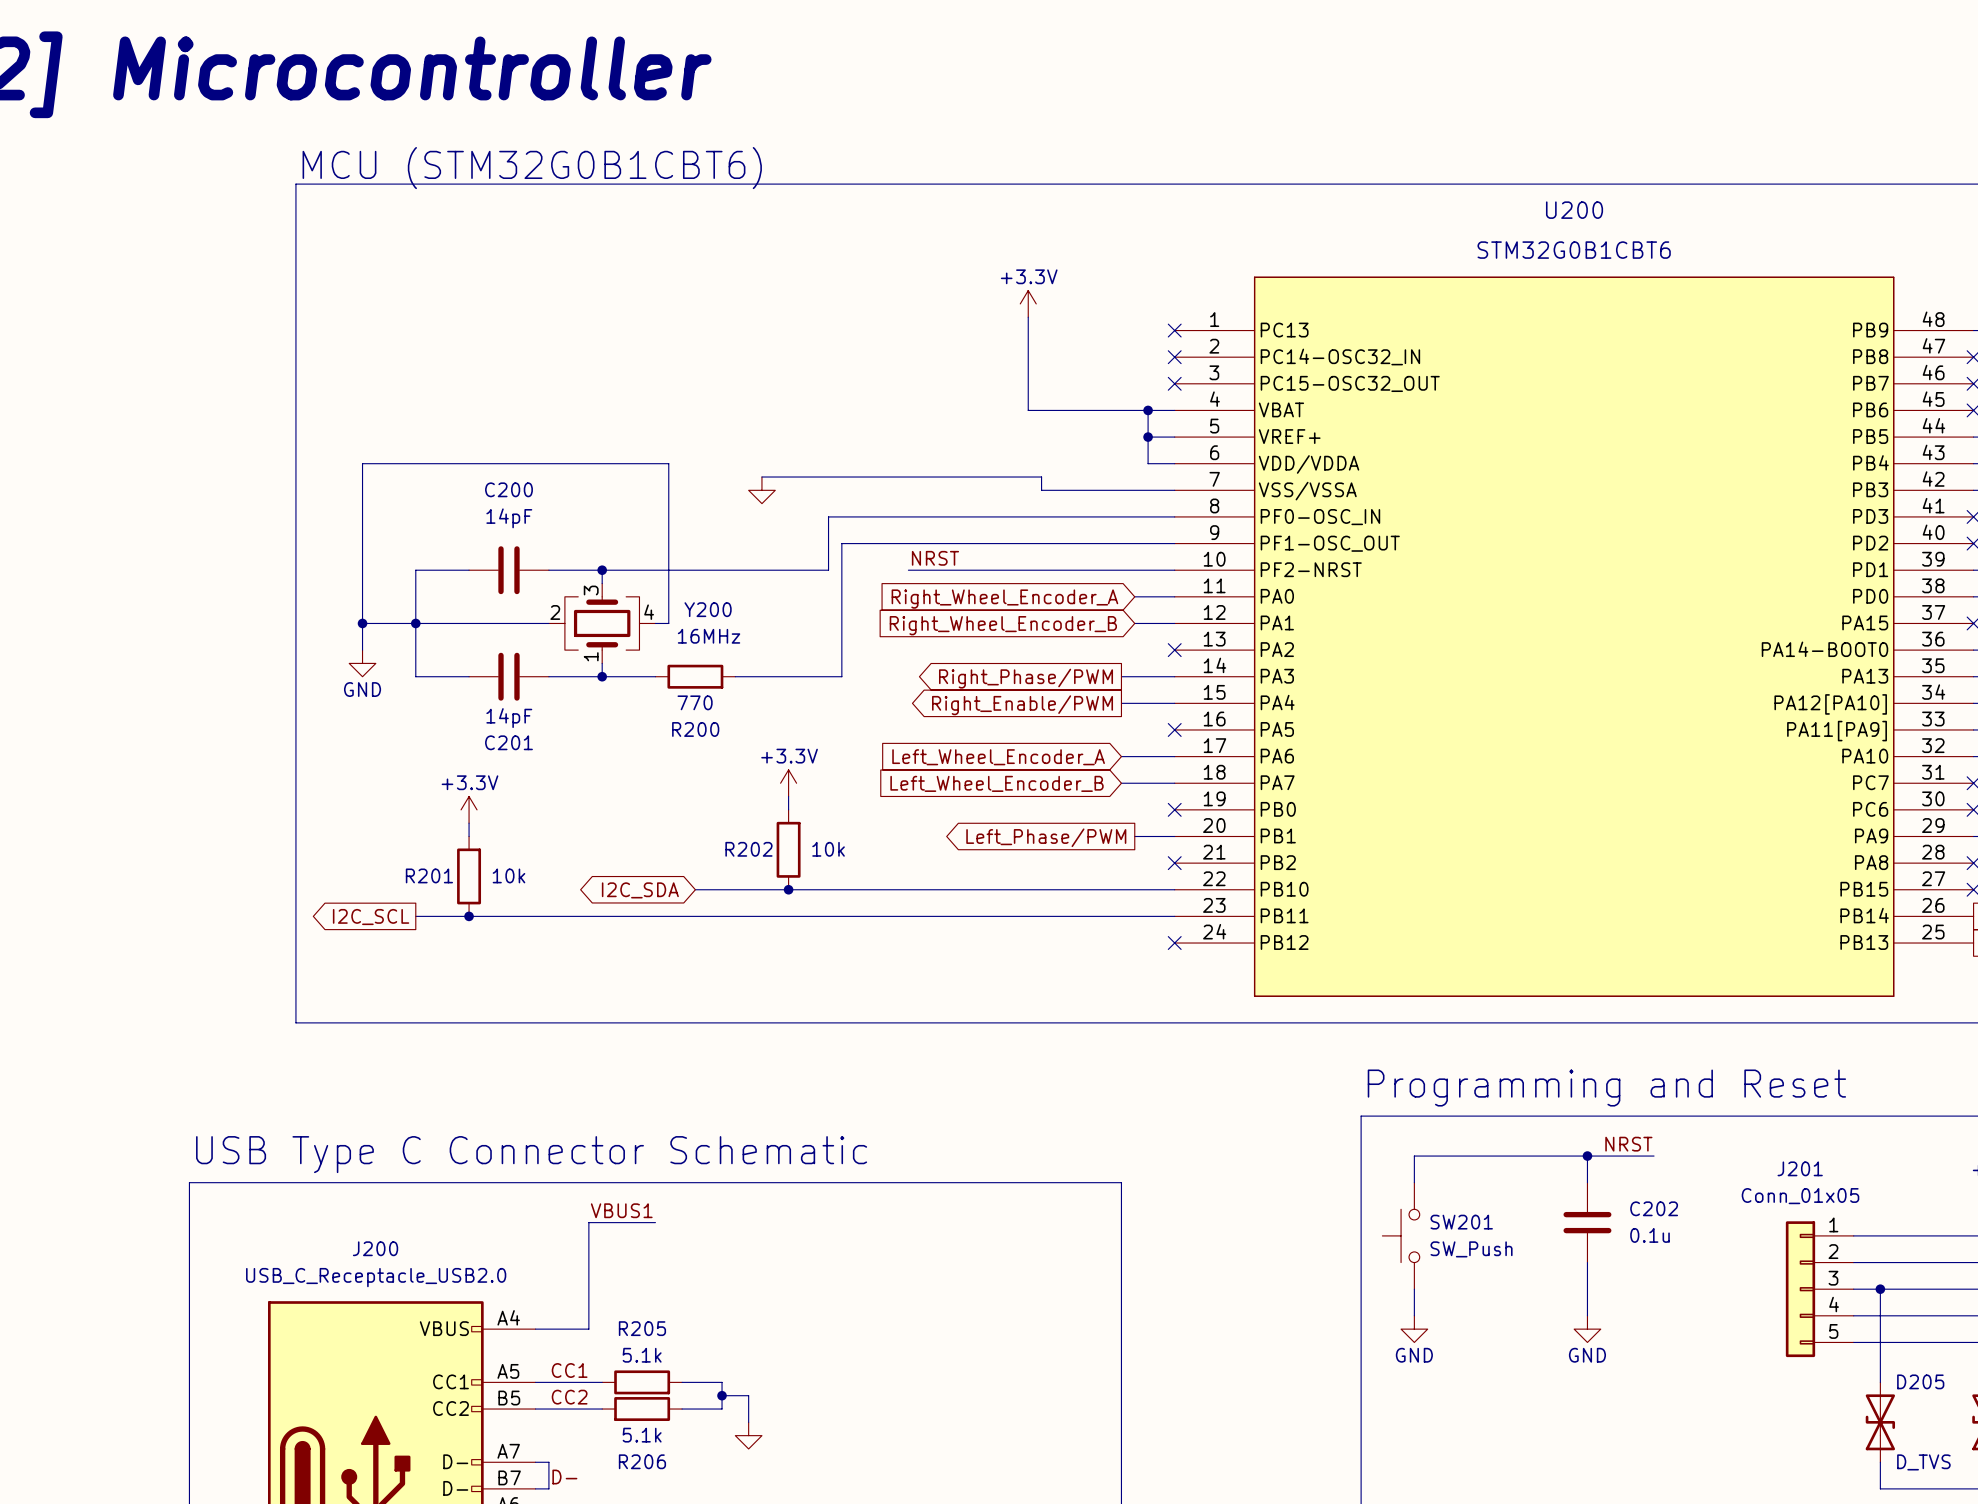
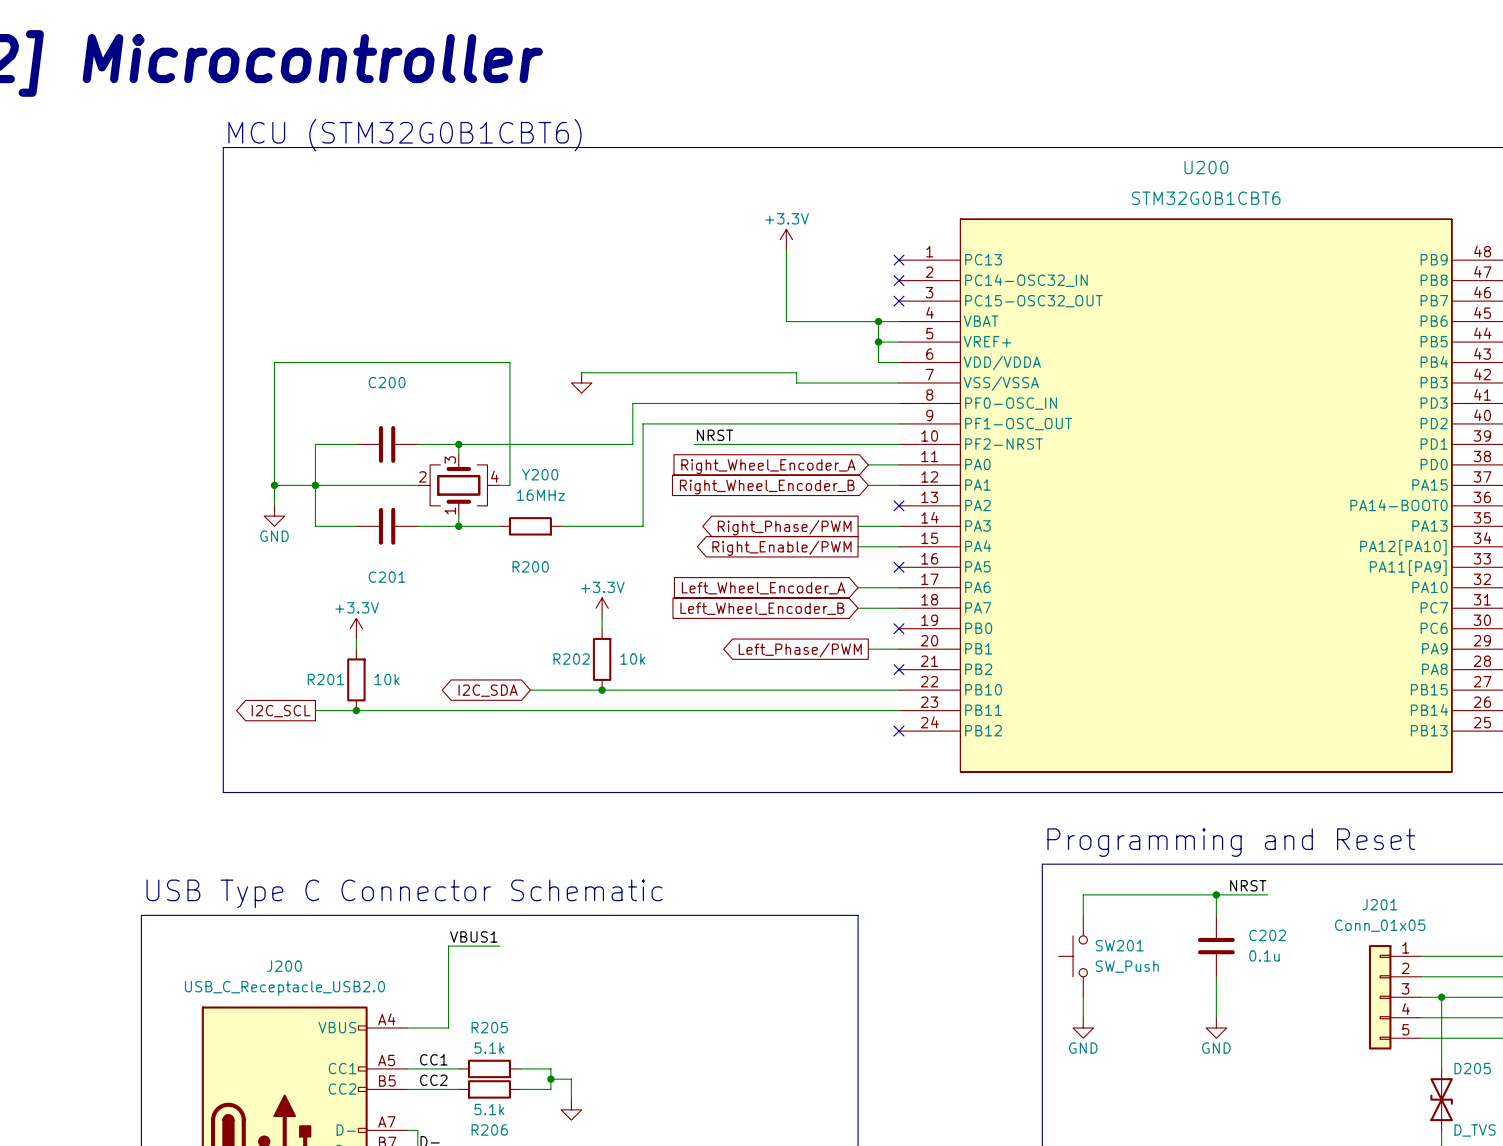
C200 value: 14pF (509, 518) -> none
R200 value: 770 (695, 702) -> none
C201 value: 14pF (509, 718) -> none

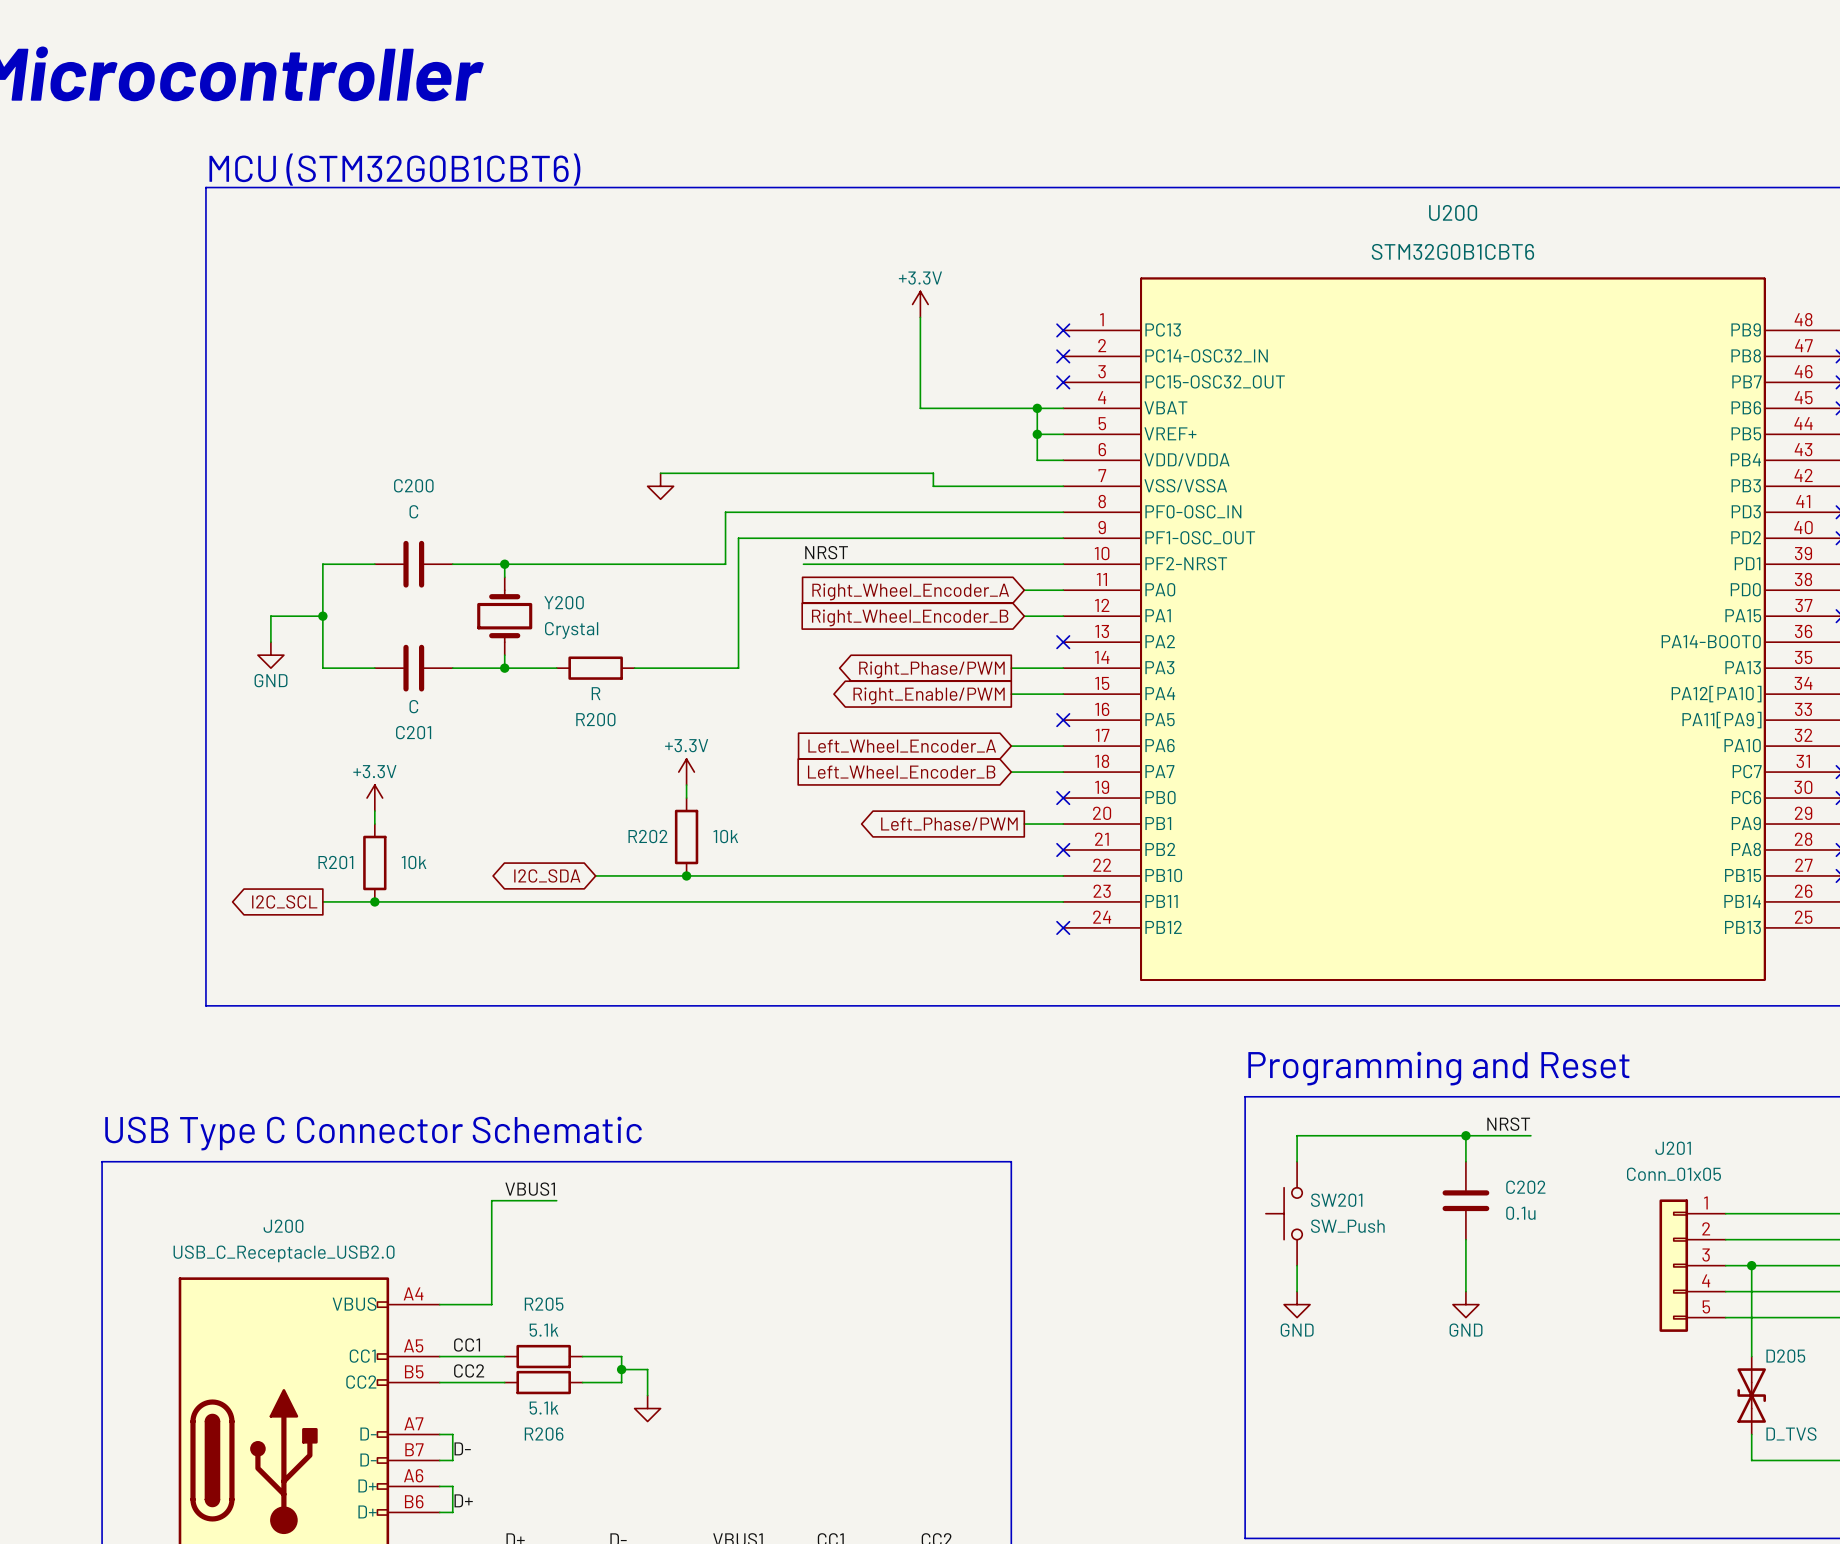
C200 value: none -> C (413, 511)
Y200 symbol: [417, 454, 500, 517] -> [477, 577, 533, 656]
Y200 name position: Y200 (540, 474) -> Y200 (564, 602)
wire: (274, 485) (274, 362) (509, 362) (509, 485) (499, 485) -> none
junction: (274, 485) -> none
wire: (315, 485) (417, 485) -> none
Y200 value: 16MHz (540, 495) -> Crystal (571, 630)
R200 value: none -> R (596, 693)
C201 value: none -> C (413, 706)

